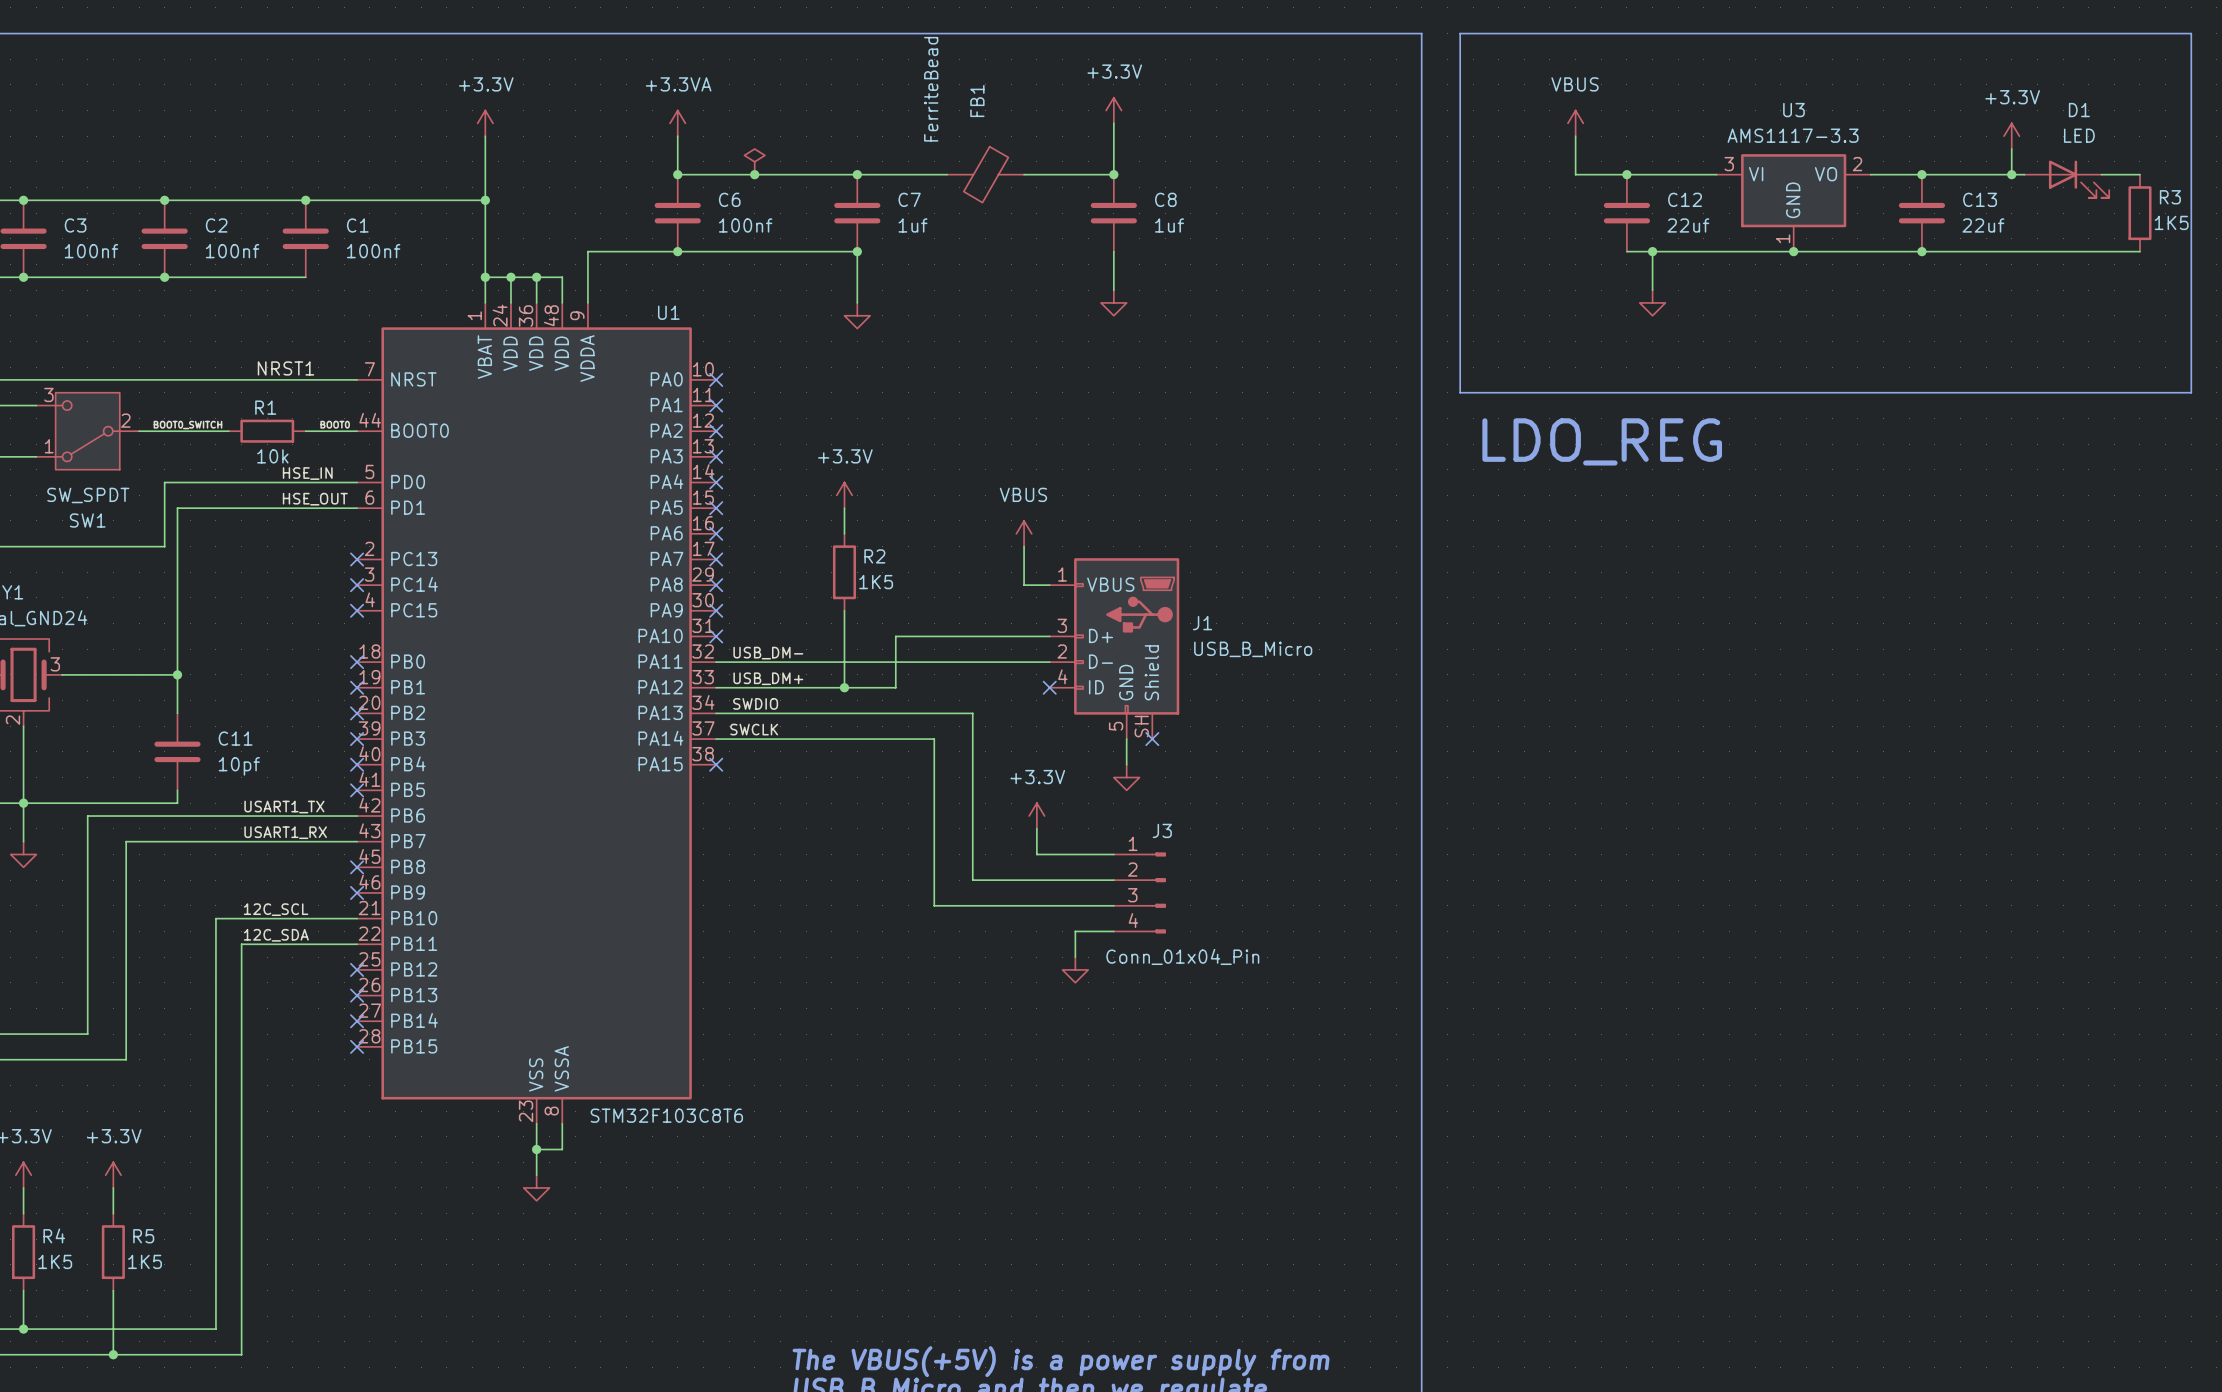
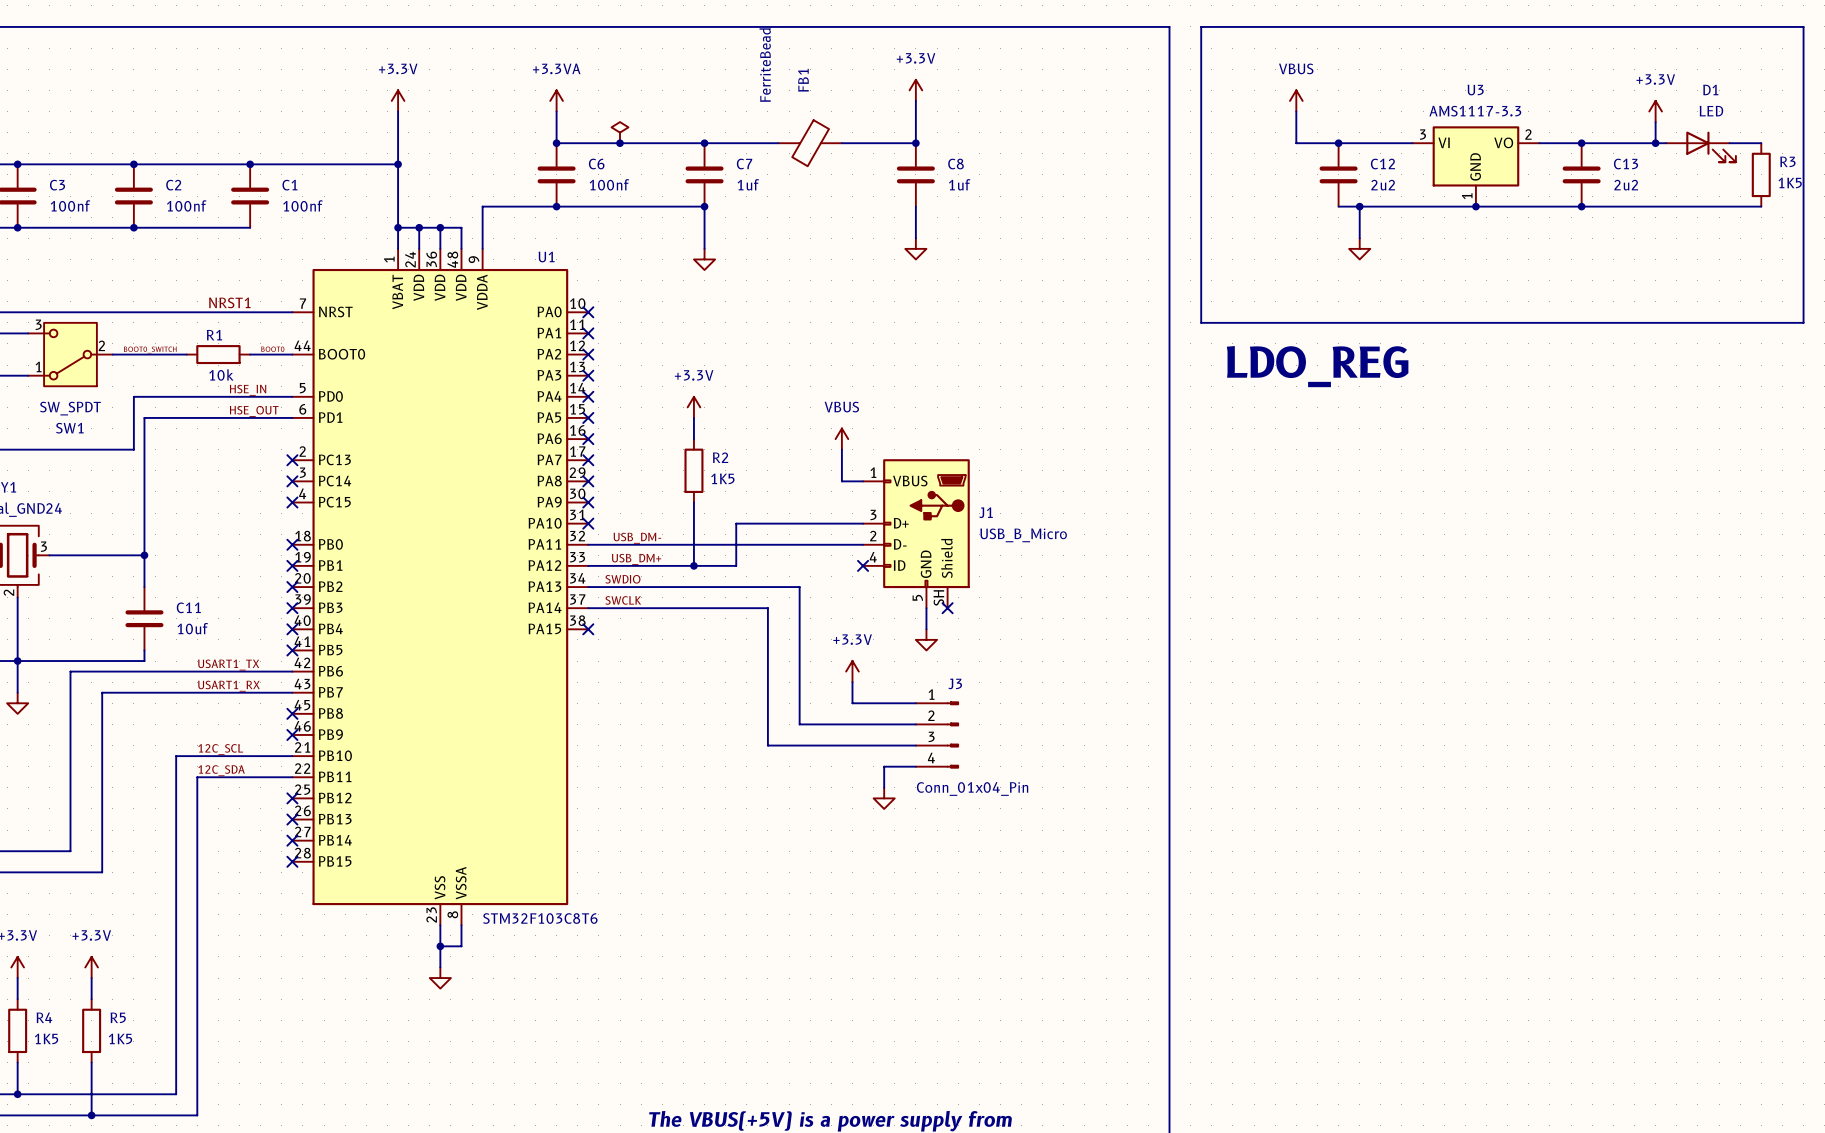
C12 value: 22uf (1688, 225) -> 2u2 (1383, 185)
C13 value: 22uf (1983, 225) -> 2u2 (1626, 185)
C11 value: 10pf (239, 766) -> 10uf (192, 628)

